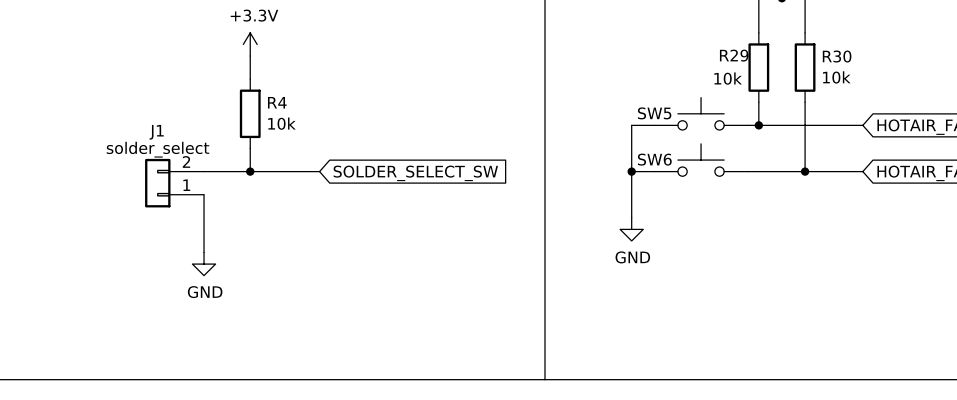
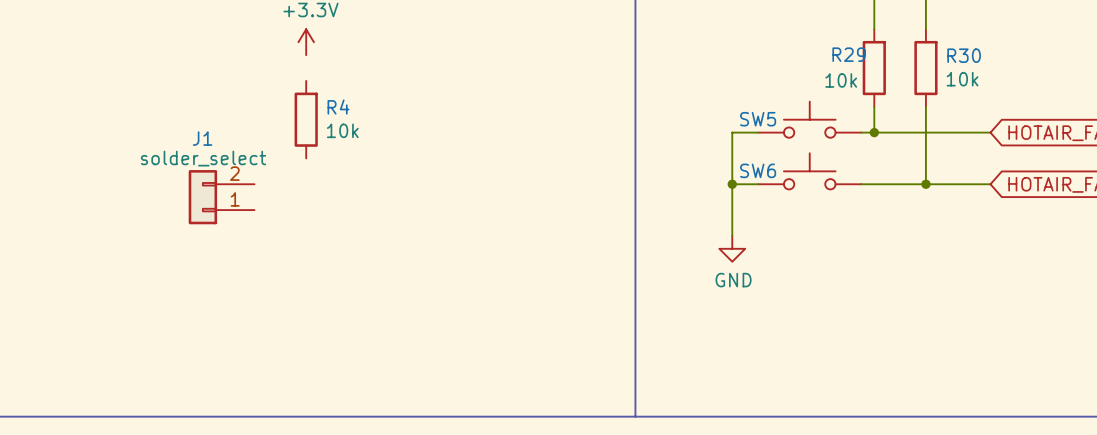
wire: (250, 56) (250, 79) -> none
wire: (250, 148) (250, 171) -> none
wire: (204, 171) (319, 171) -> none
junction: (250, 171) -> none
global label: SOLDER_SELECT_SW (415, 173) -> none
wire: (204, 194) (204, 252) -> none
power symbol: GND (204, 264) -> none

